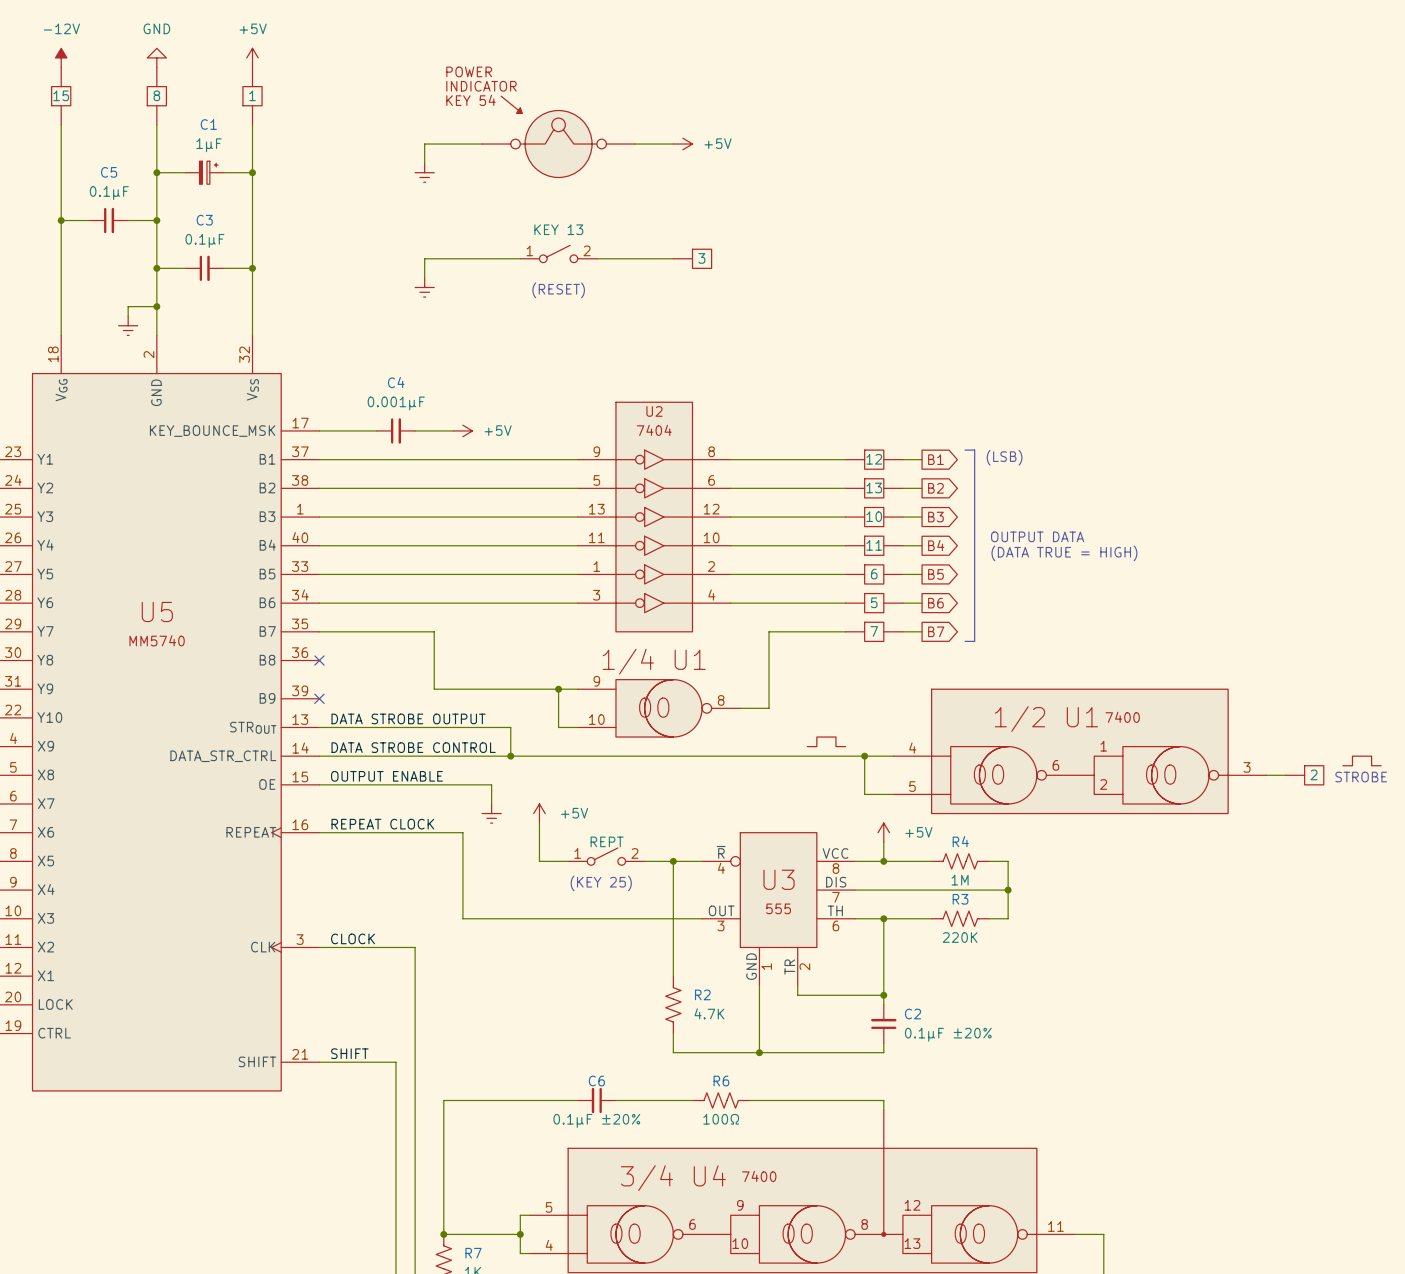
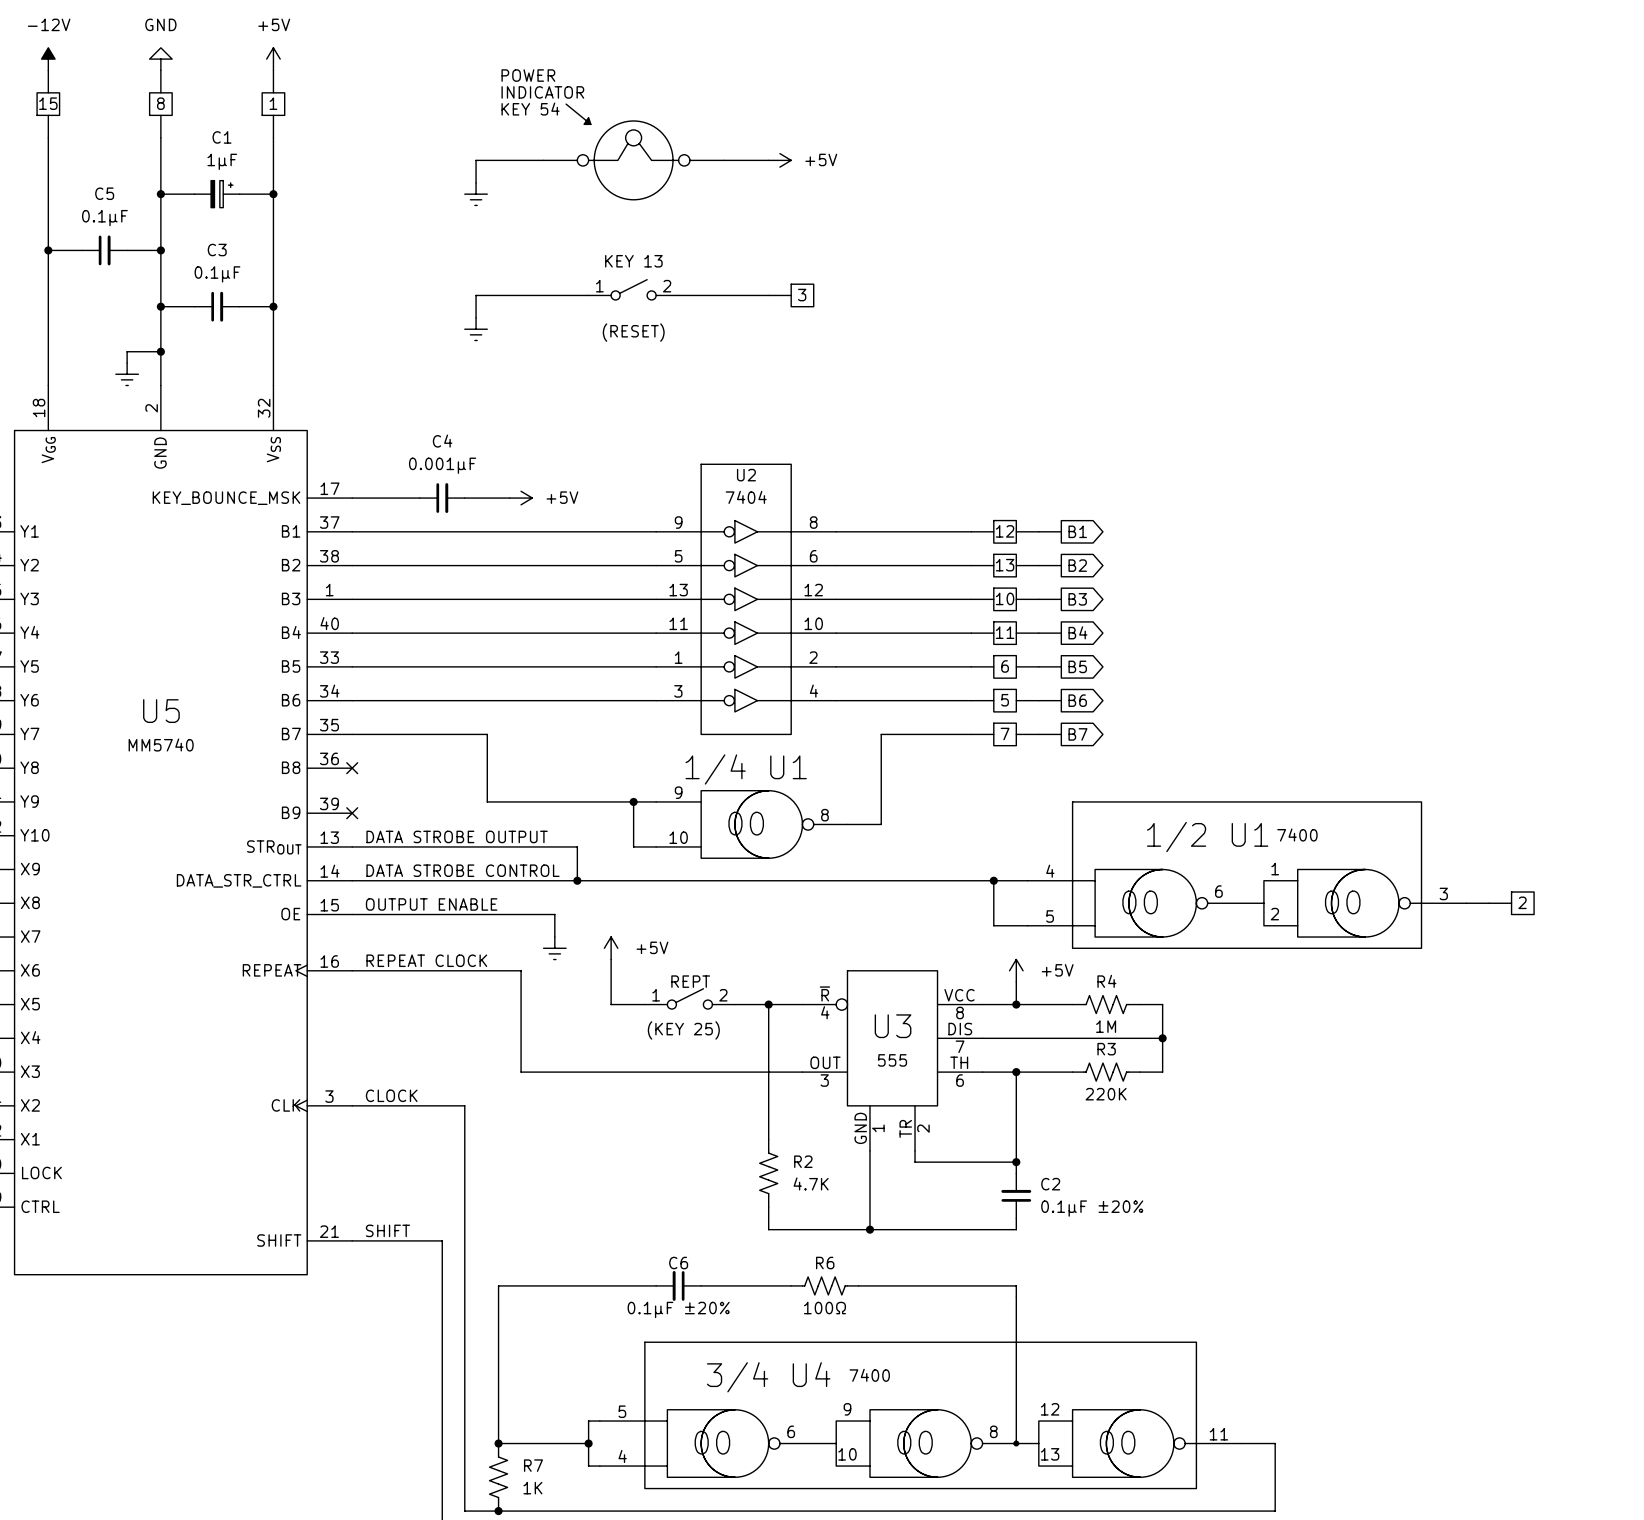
line: (965, 450) (974, 450) (974, 641) (965, 641) -> none
text: (LSB) (1004, 457) -> none
text: OUTPUT DATA (1037, 536) -> none
text: (DATA TRUE = HIGH) (1064, 553) -> none
part: (826, 741) -> none
part: (1362, 760) -> none
text: STROBE (1361, 777) -> none

